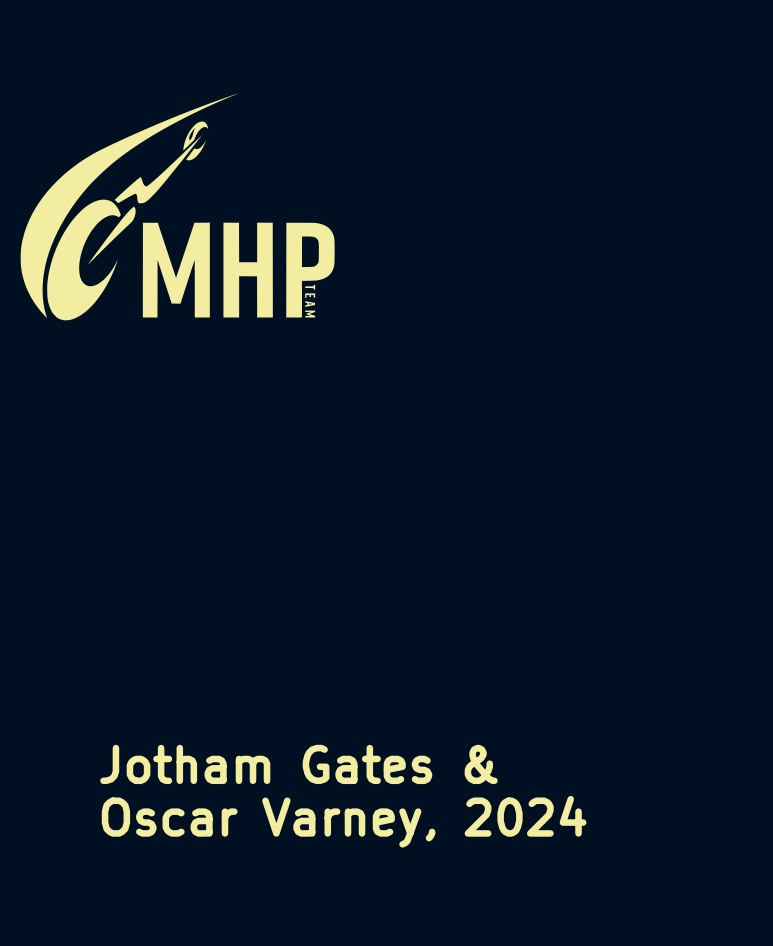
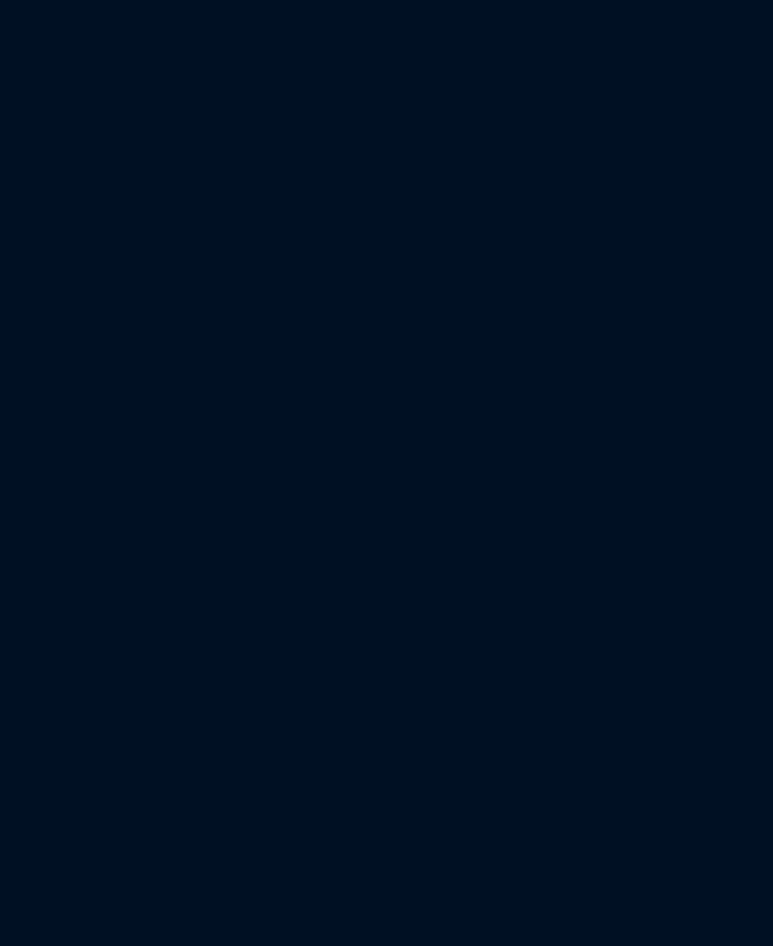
drawing: [20, 93, 335, 321] -> none
text: Jotham Gates & (298, 764) -> none
text: Oscar Varney, 2024 (344, 821) -> none

